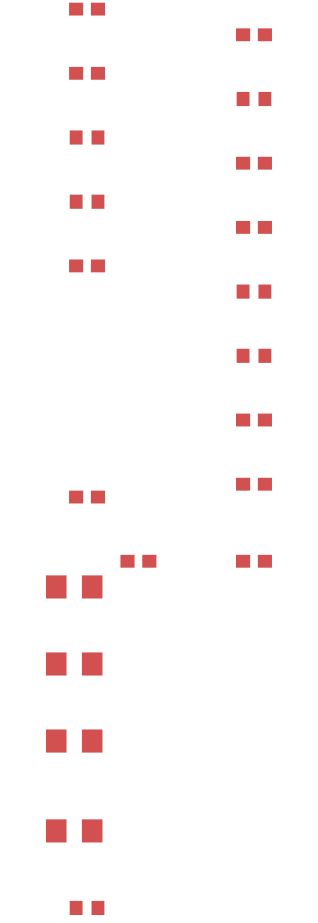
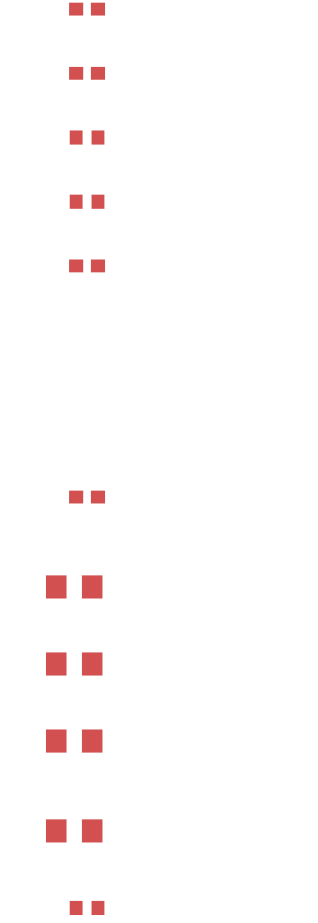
part: (253, 34) -> none
part: (253, 98) -> none
part: (253, 163) -> none
part: (253, 227) -> none
part: (253, 291) -> none
part: (253, 355) -> none
part: (253, 420) -> none
part: (253, 484) -> none
part: (138, 561) -> none
part: (253, 561) -> none

